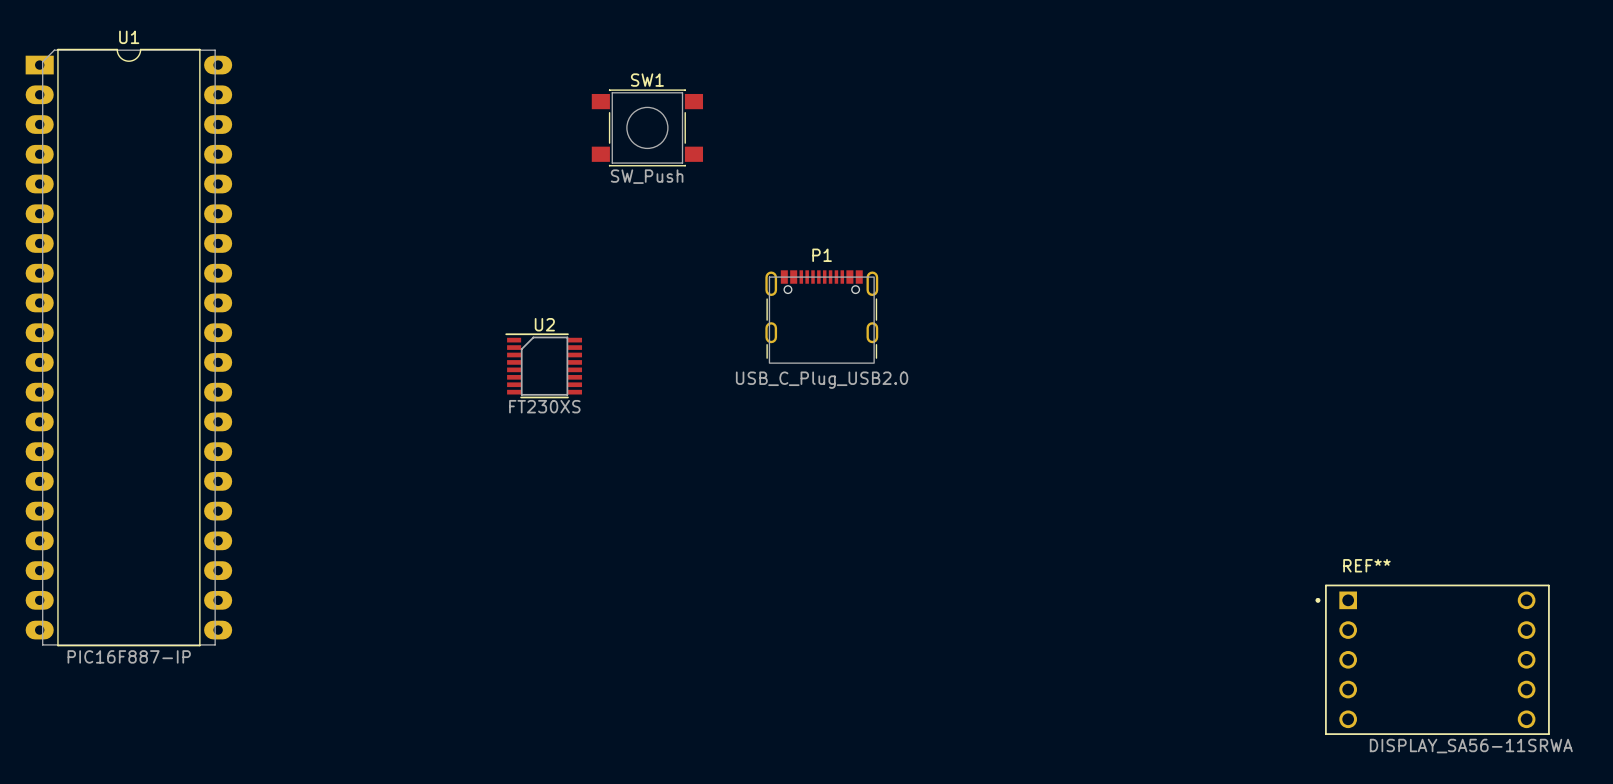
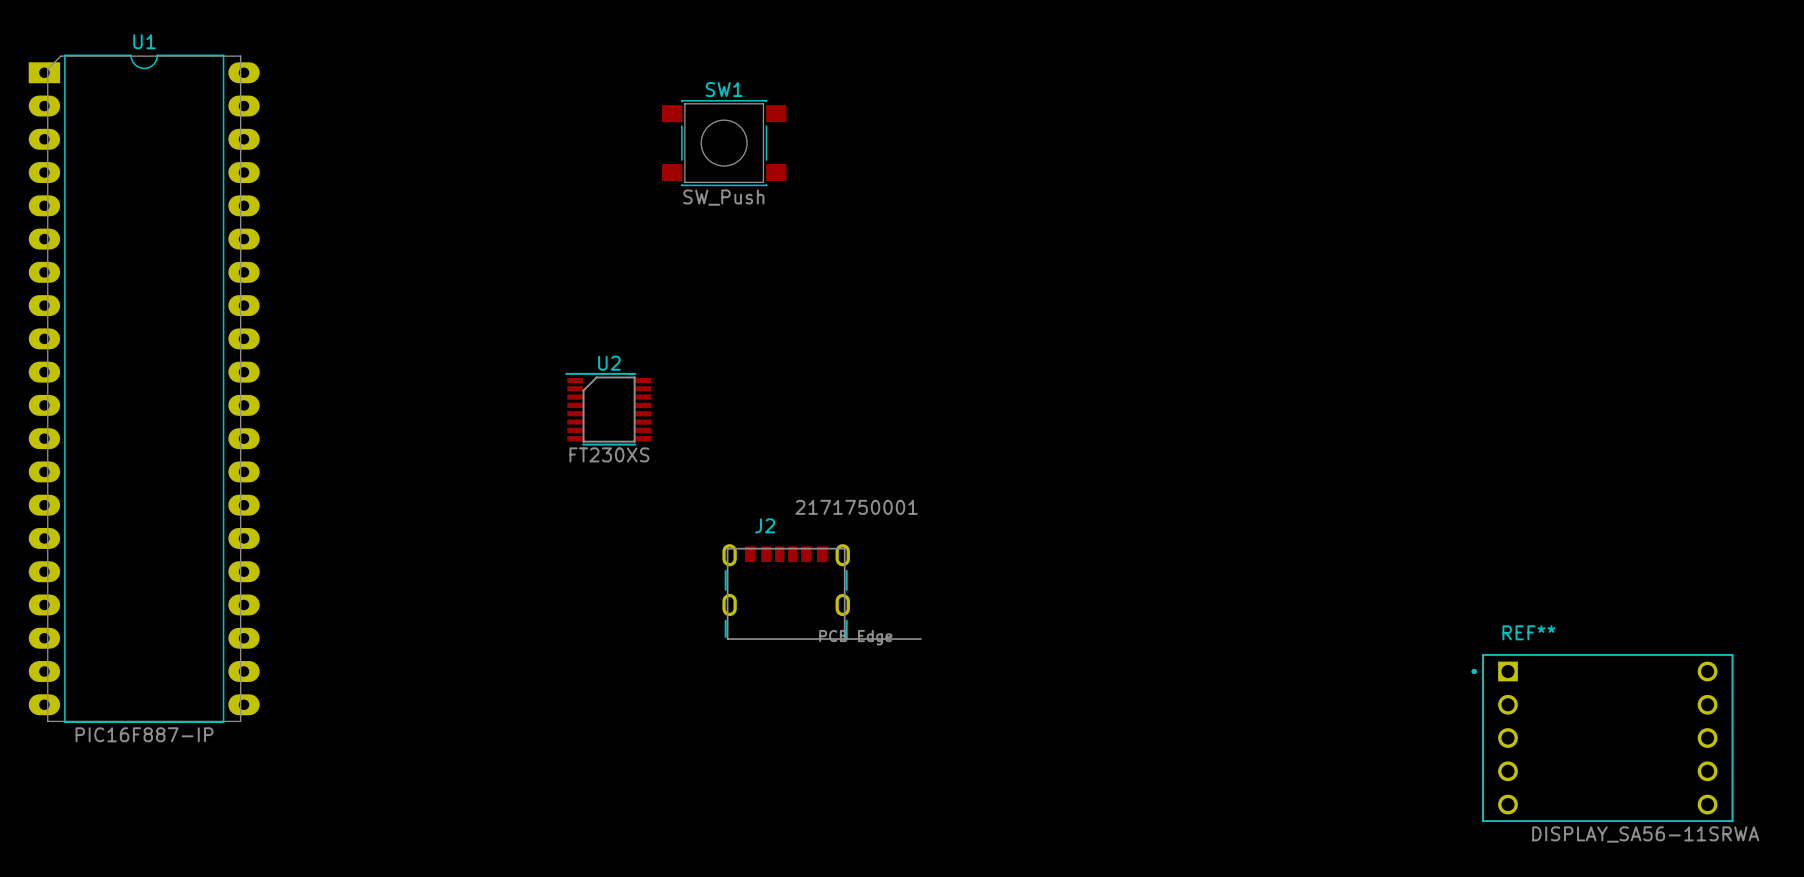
P1: USB_C_Plug_USB2.0 (821, 317) -> none
J2: none -> 2171750001 (822, 591)

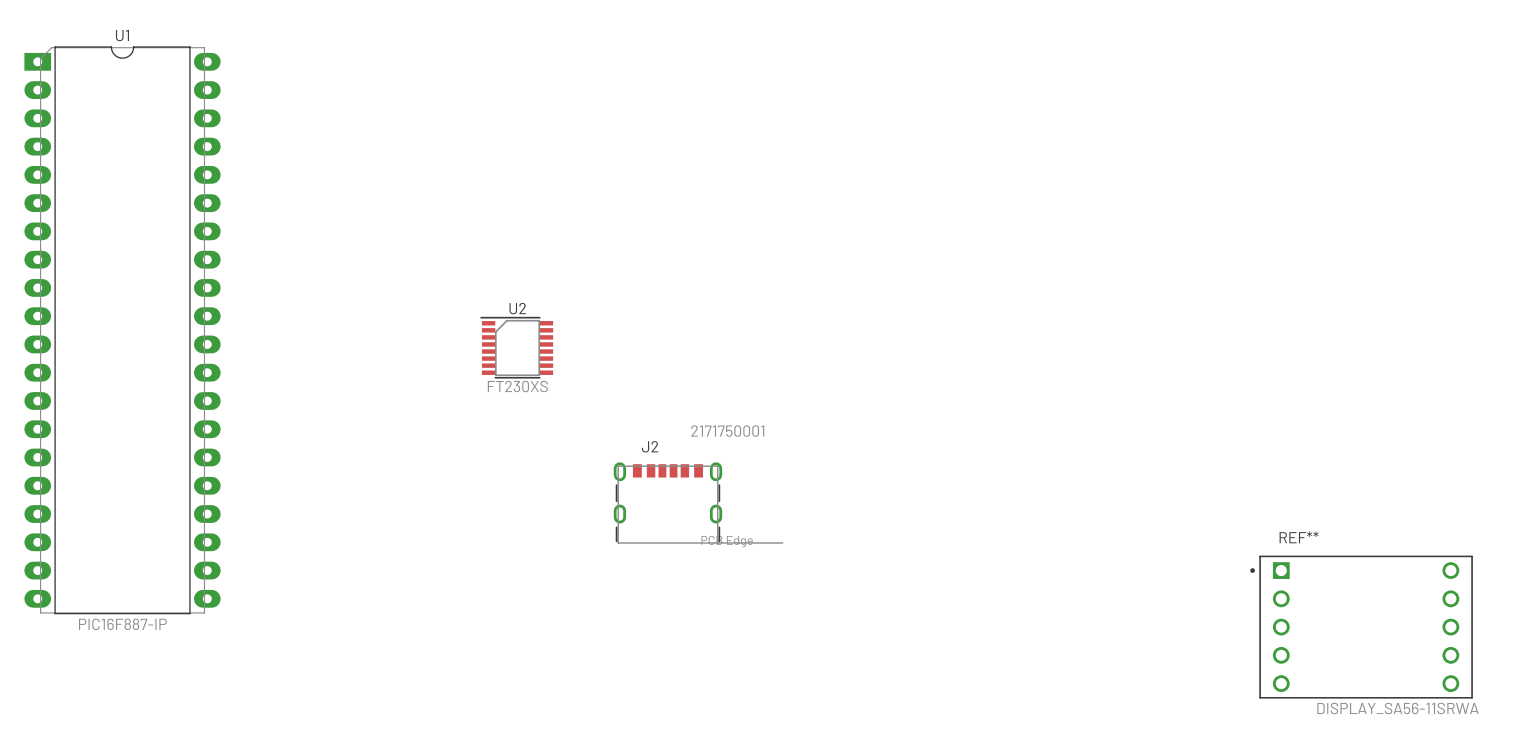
SW1: SW_Push (724, 143) -> none

